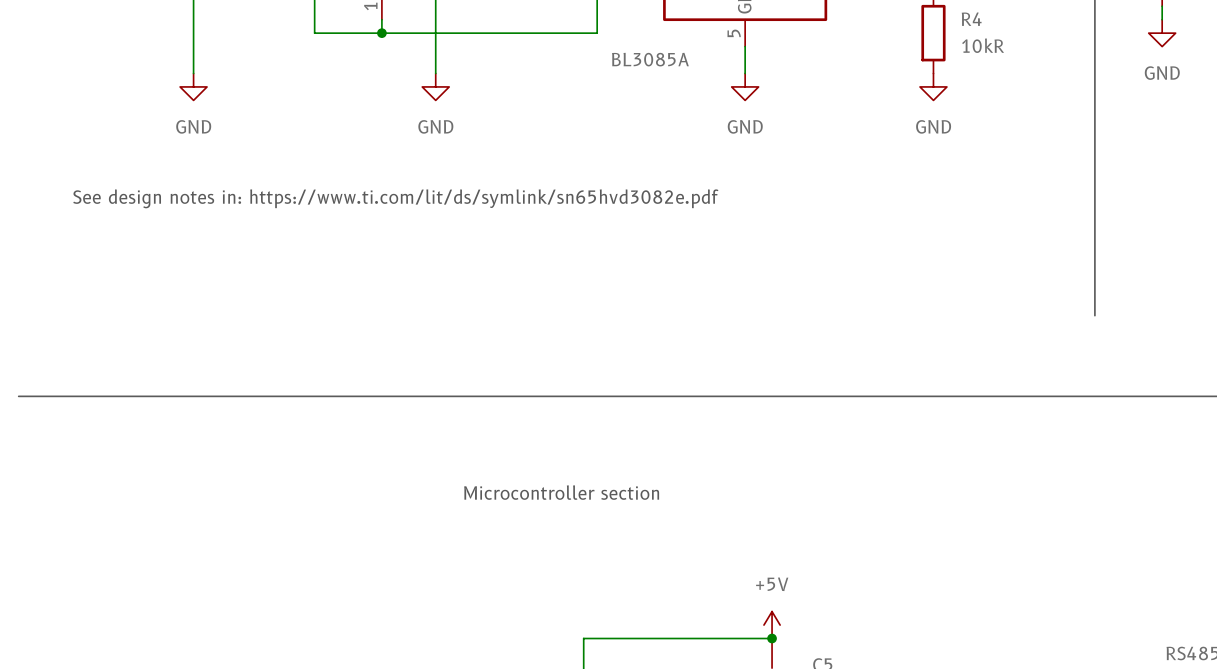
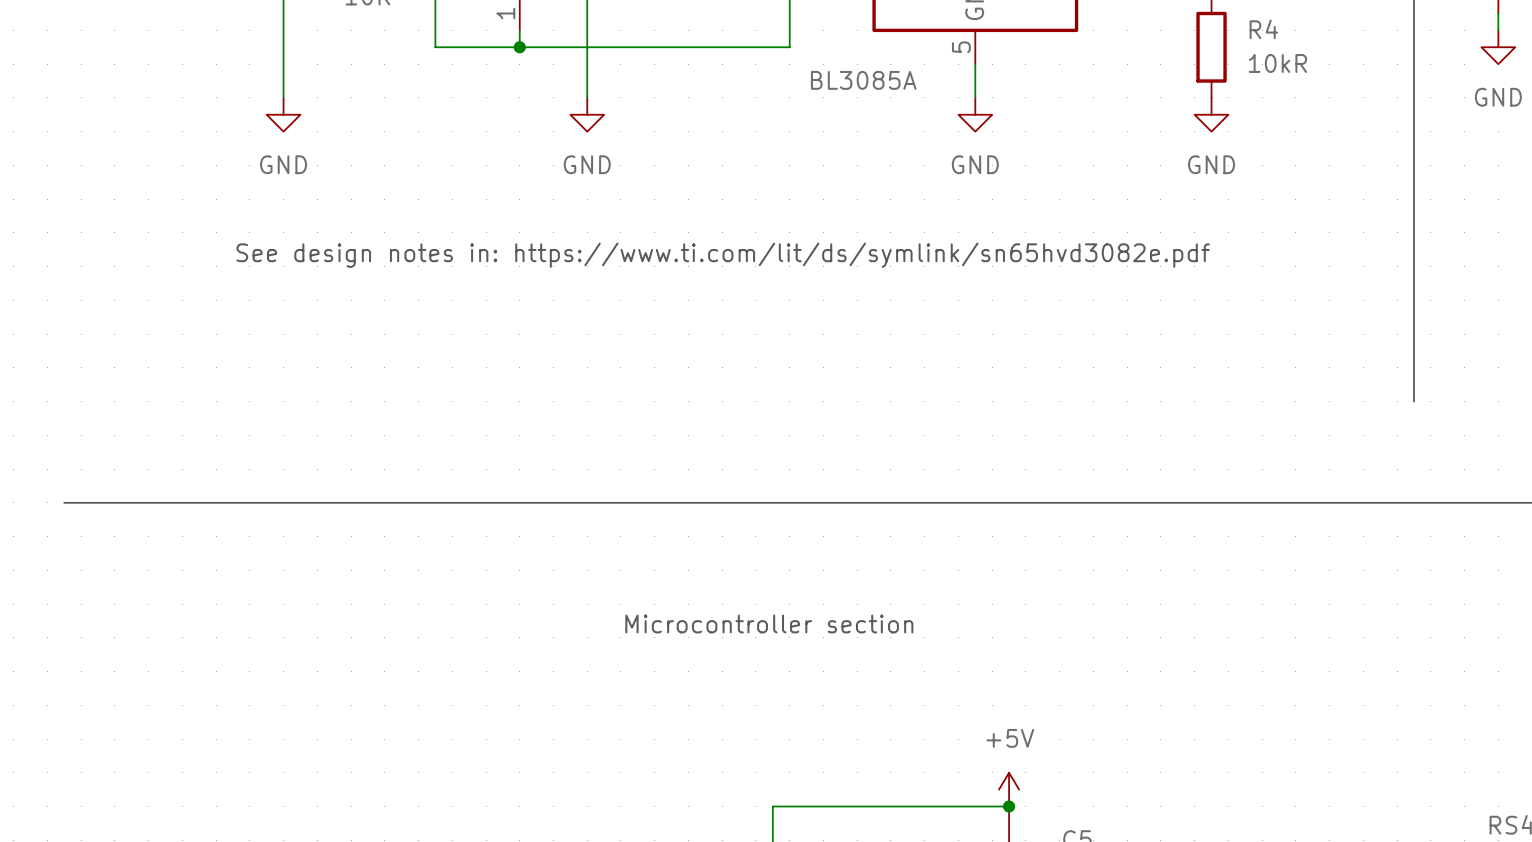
text position: See design notes in: https://www.ti.com/lit/ds/symlink/sn65hvd3082e.pdf (395, 198) -> See design notes in: https://www.ti.com/lit/ds/symlink/sn65hvd3082e.pdf (723, 255)

